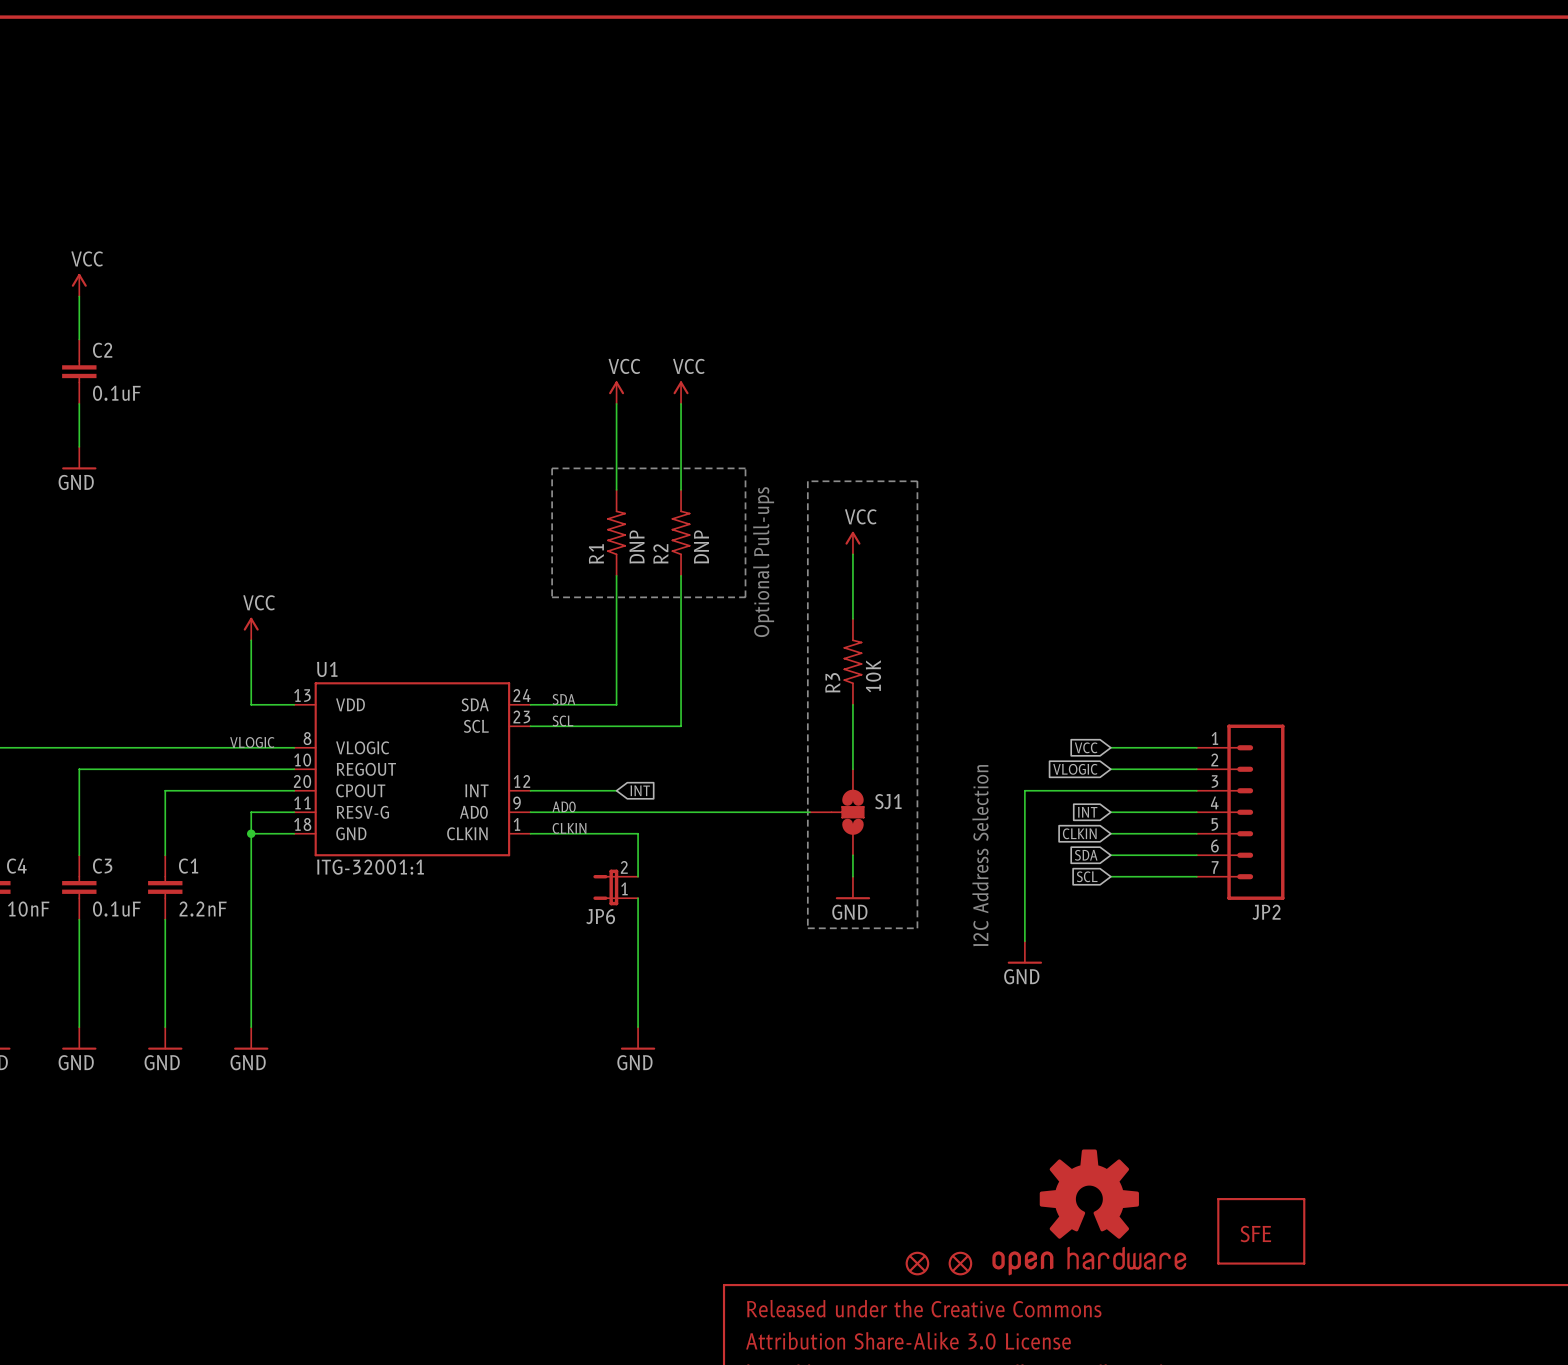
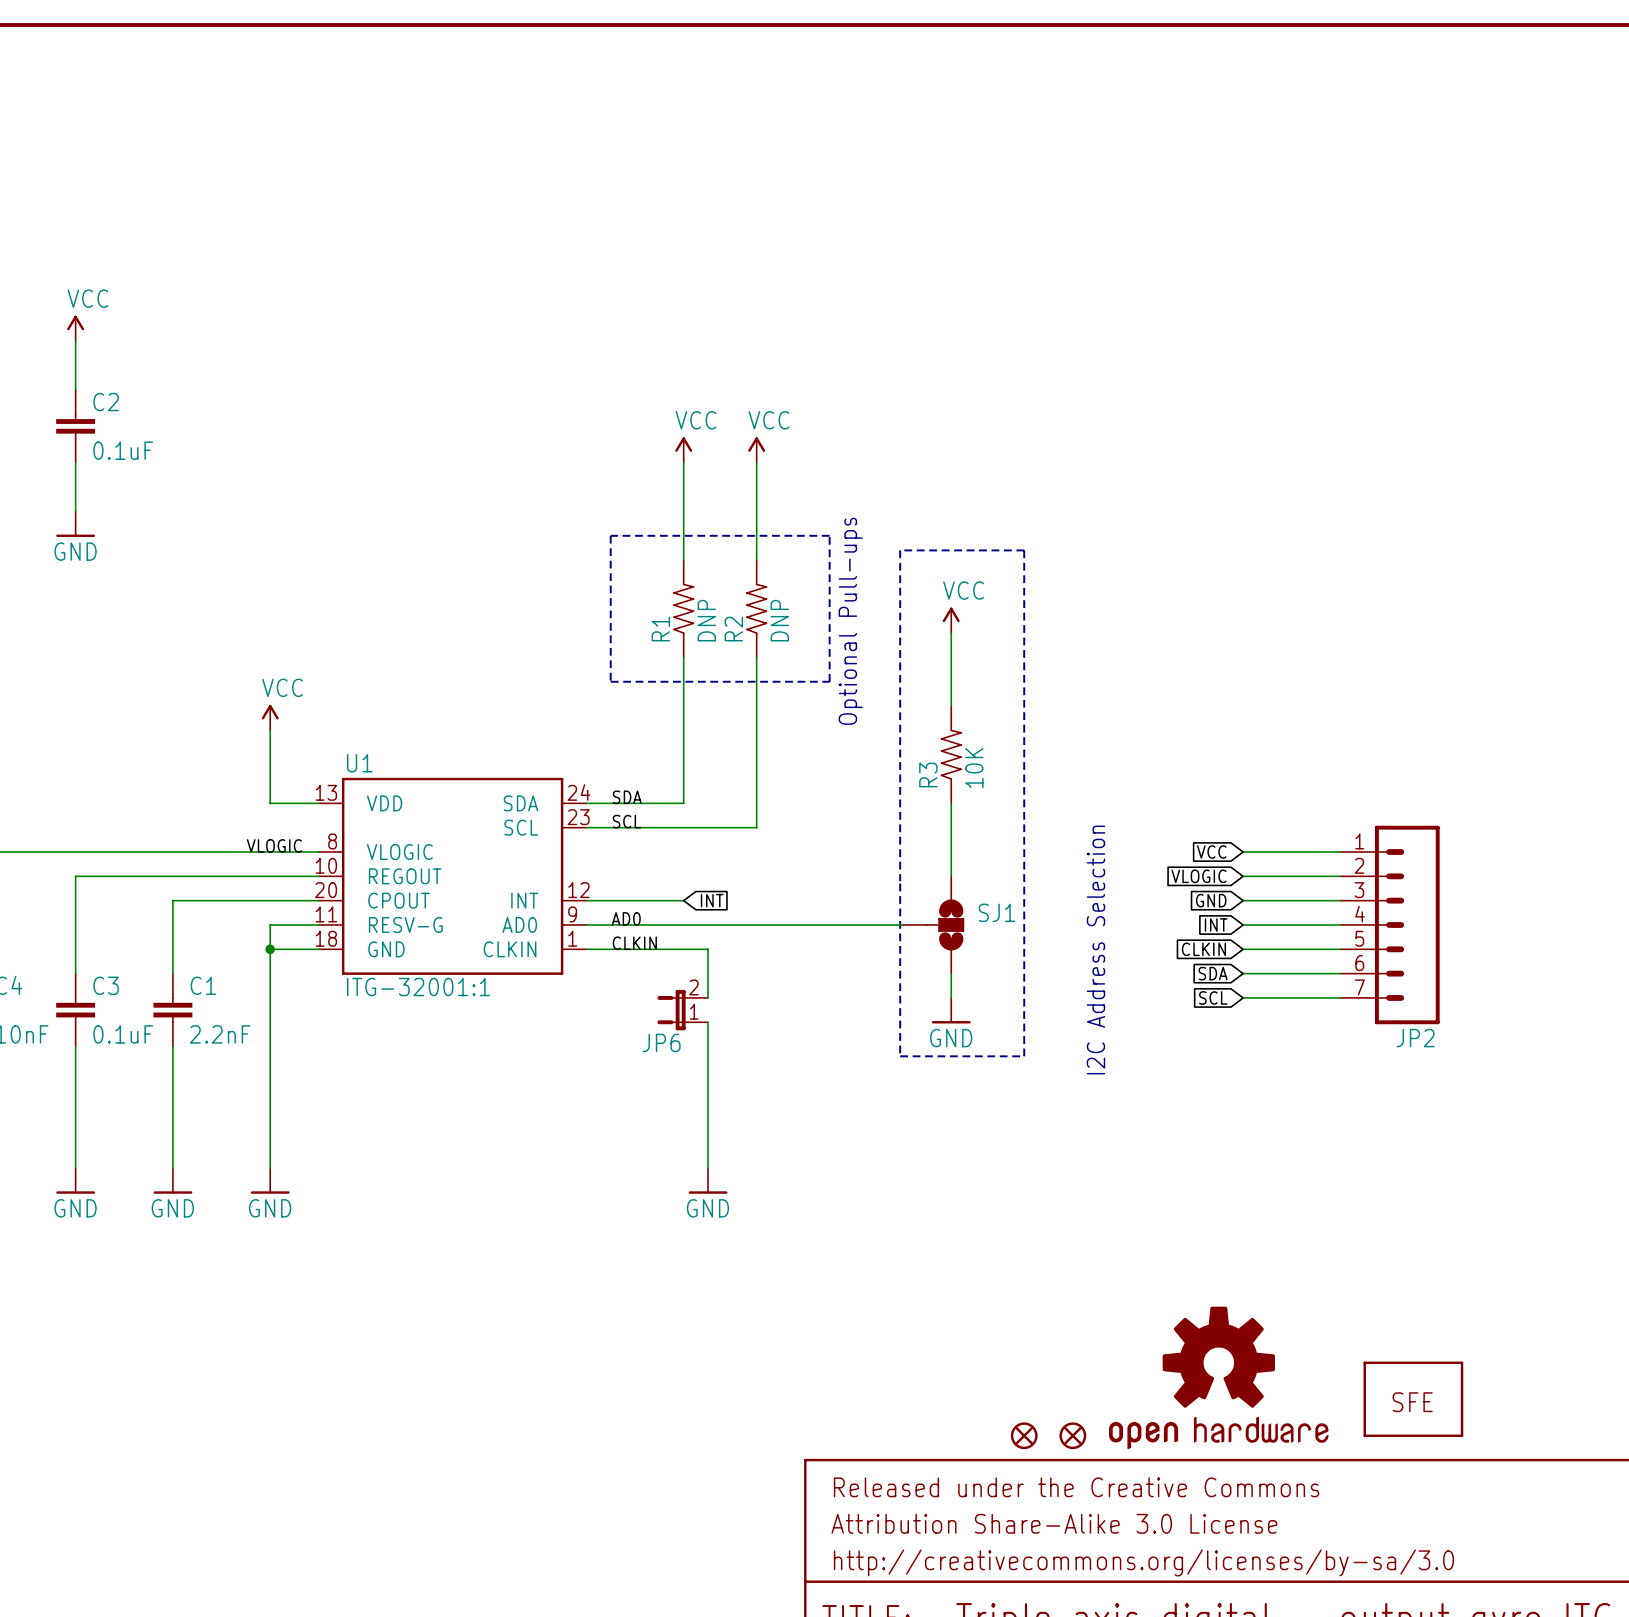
global label: none -> GND (1211, 900)
wire: (1110, 790) (1024, 790) (1024, 941) -> none
power symbol: GND (1024, 952) -> none

